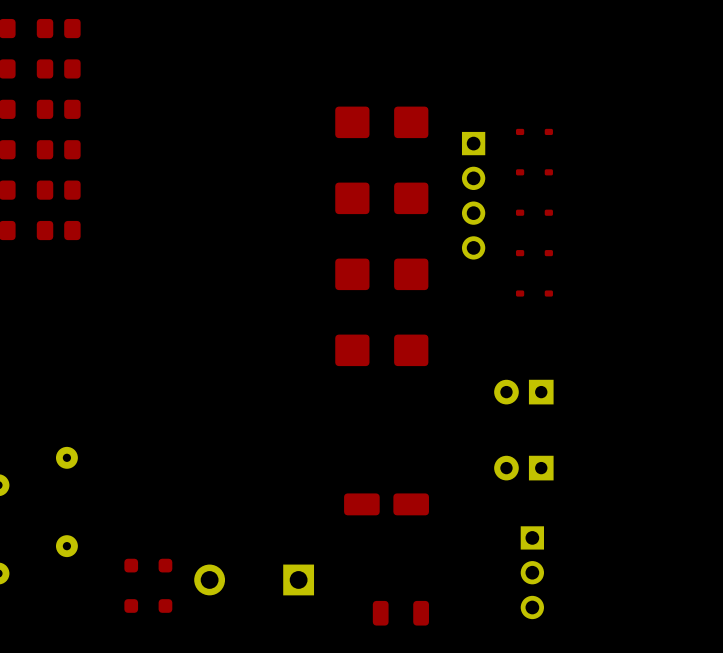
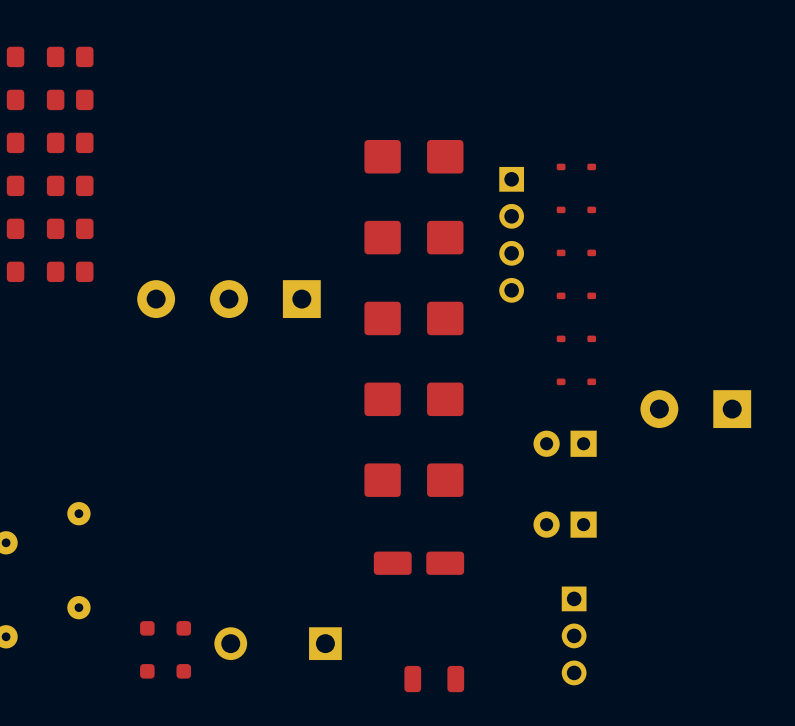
part: none -> (228, 299)
part: none -> (576, 381)
part: none -> (695, 409)
part: none -> (413, 480)

